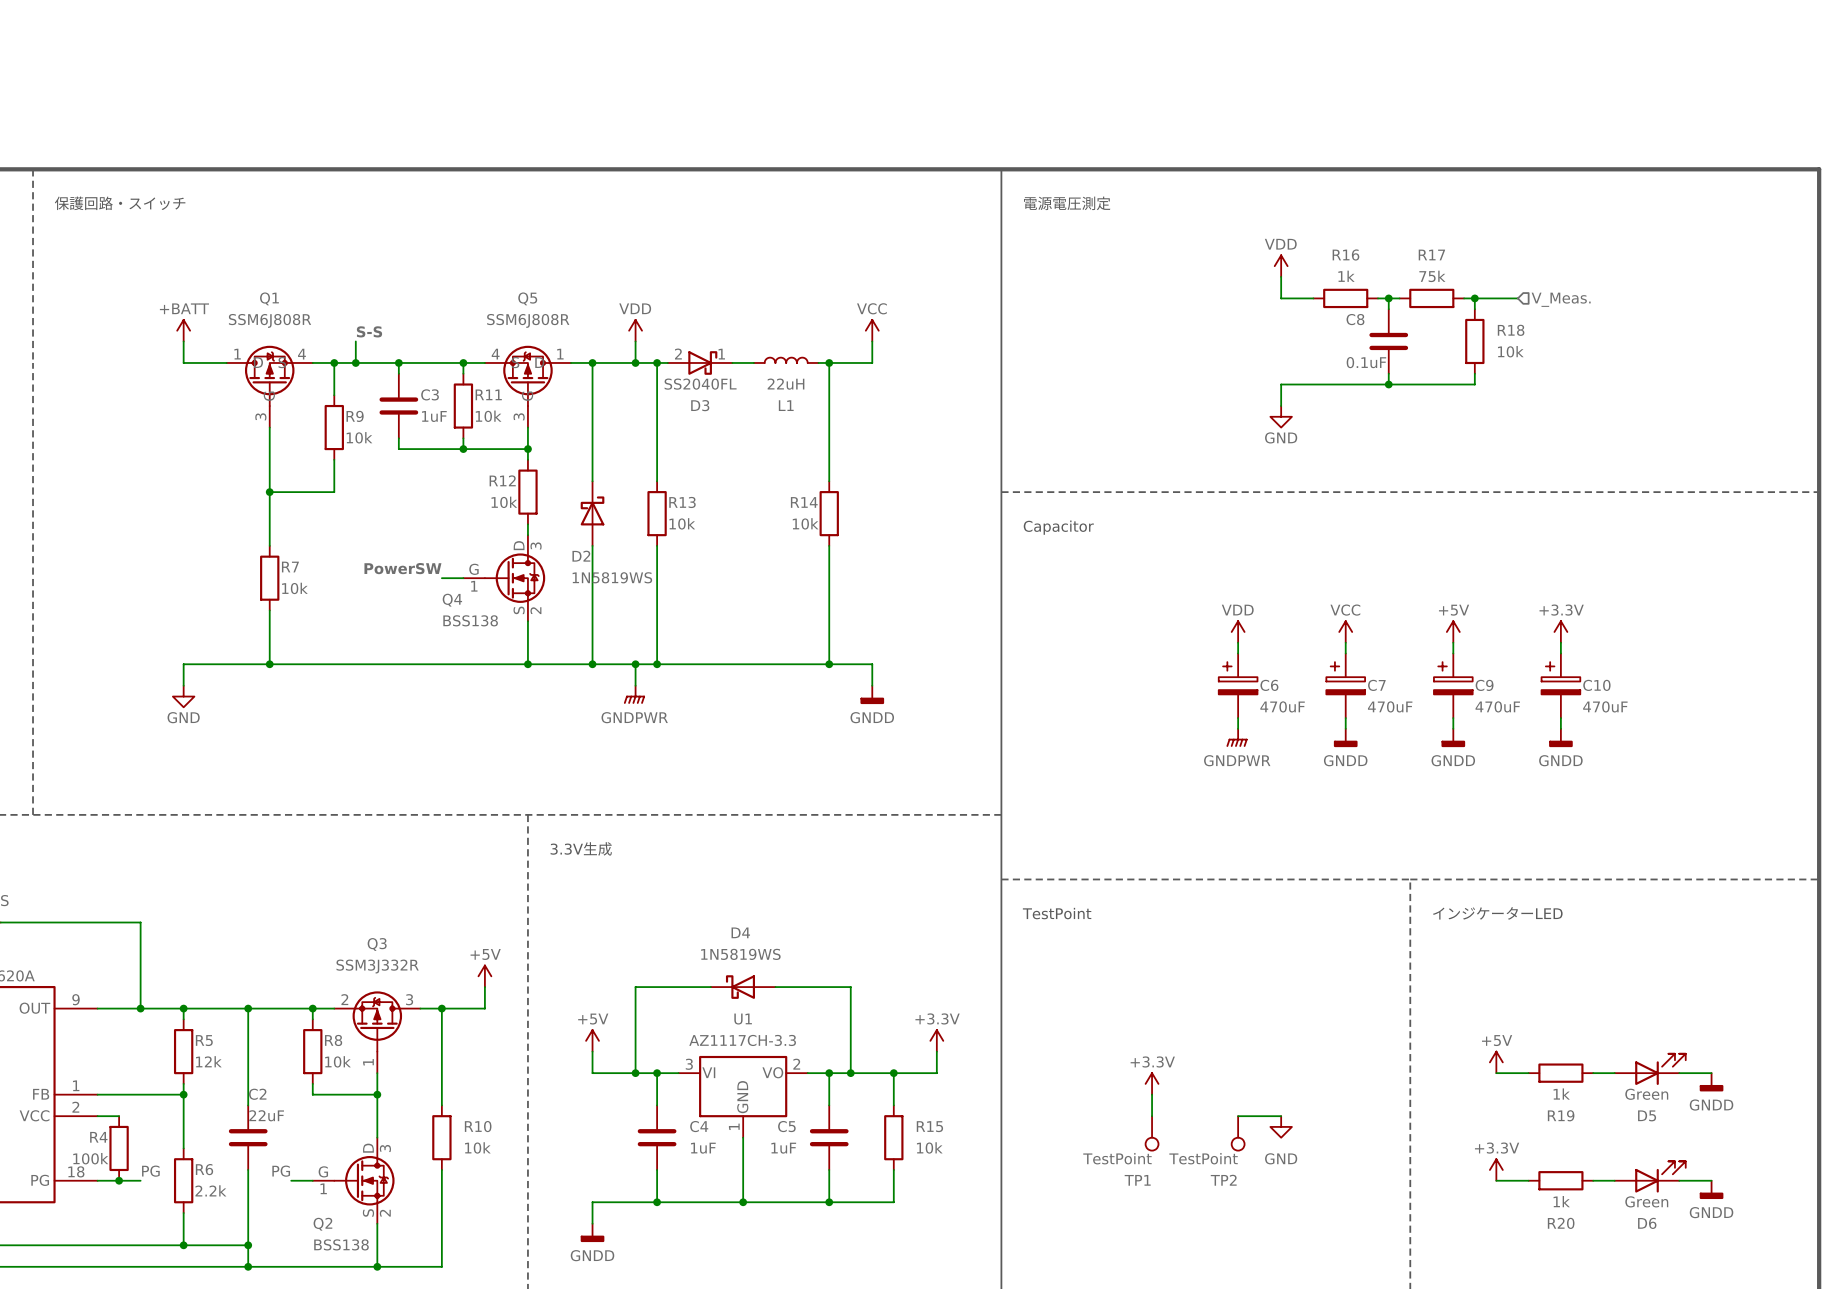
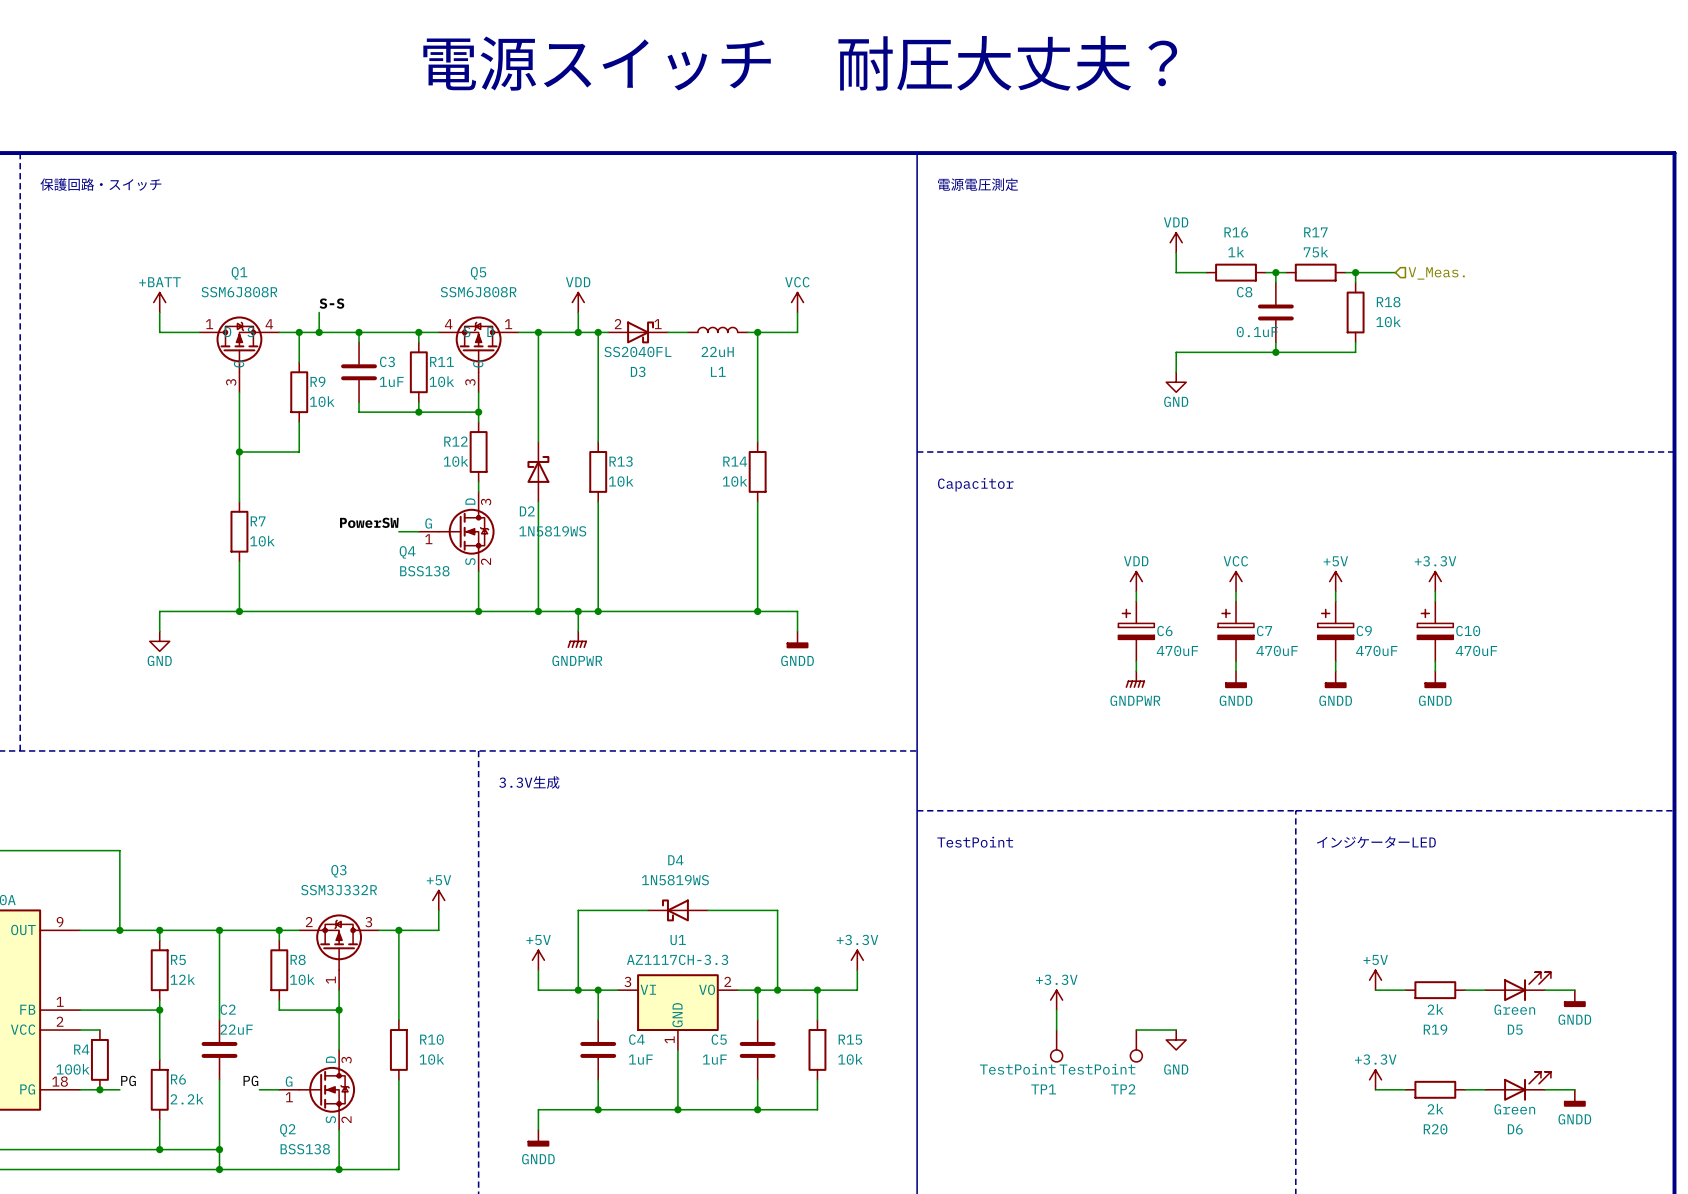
text: none -> 電源スイッチ 耐圧大丈夫？ (800, 63)
R19 value: 1k (1561, 1094) -> 2k (1435, 1009)
R20 value: 1k (1561, 1201) -> 2k (1435, 1109)

